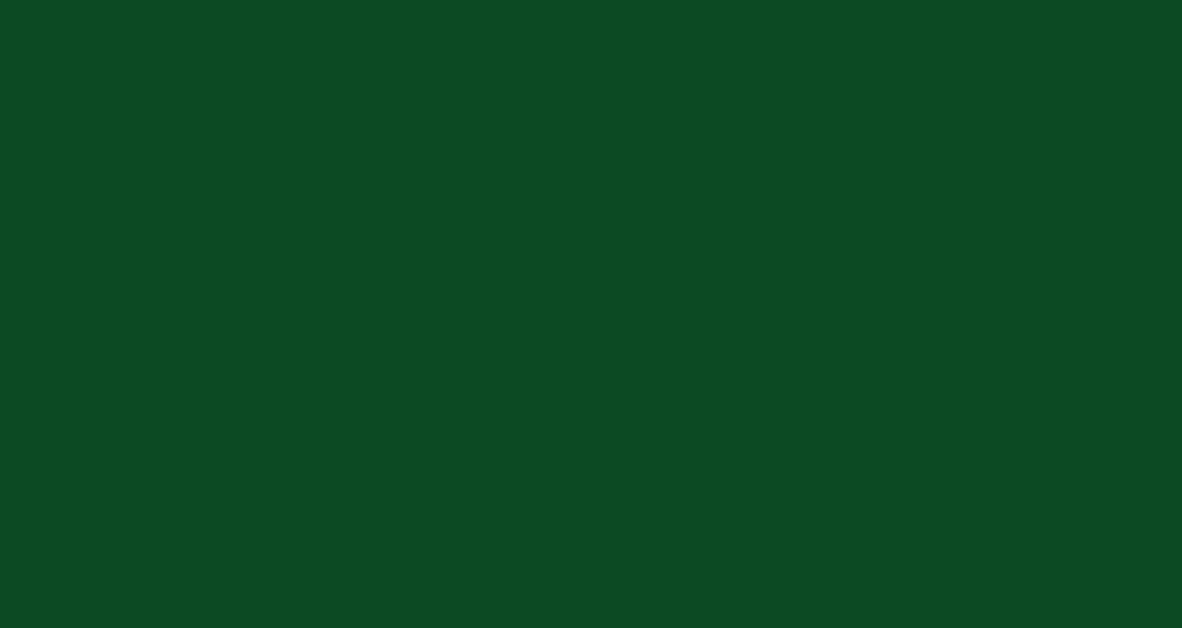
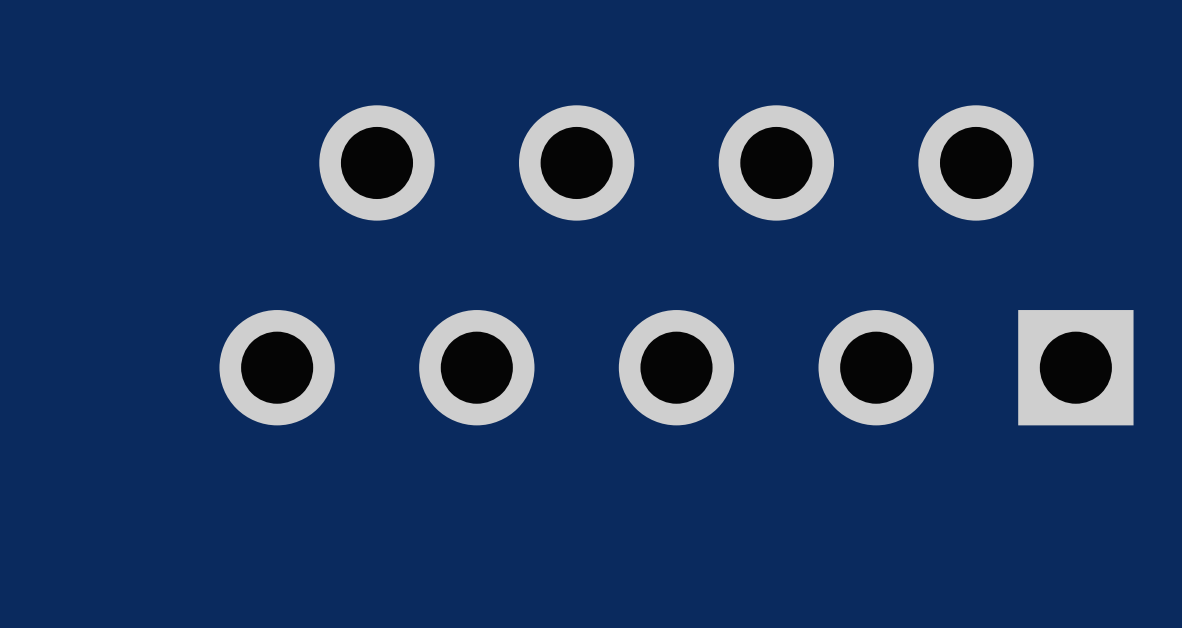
part: none -> (676, 265)

